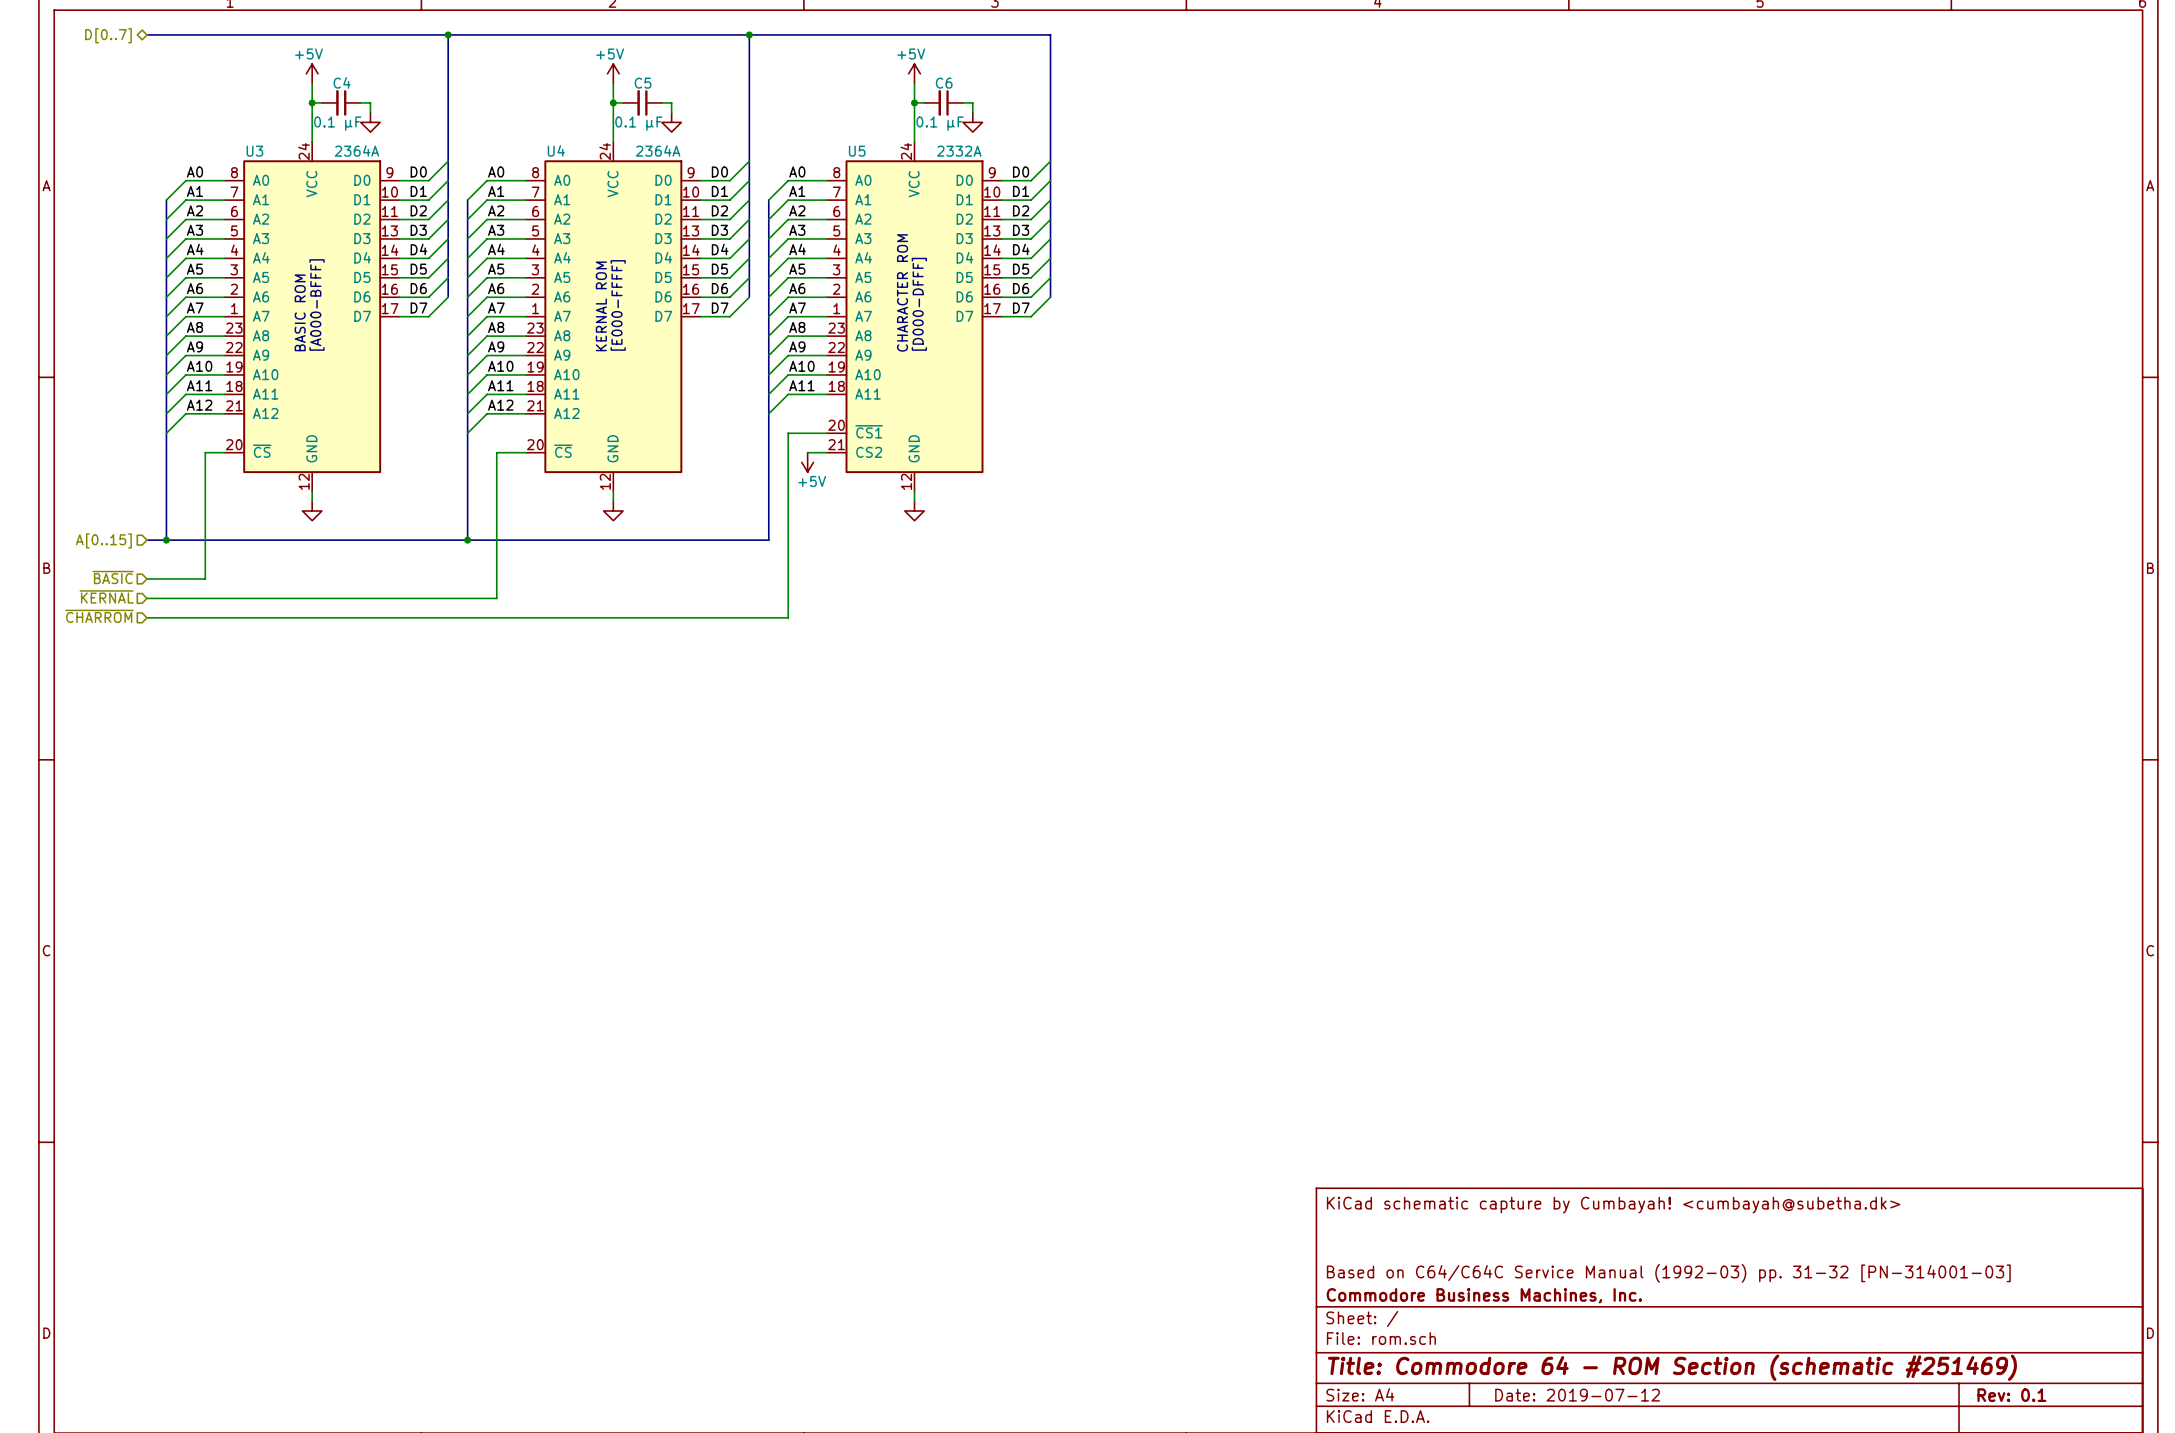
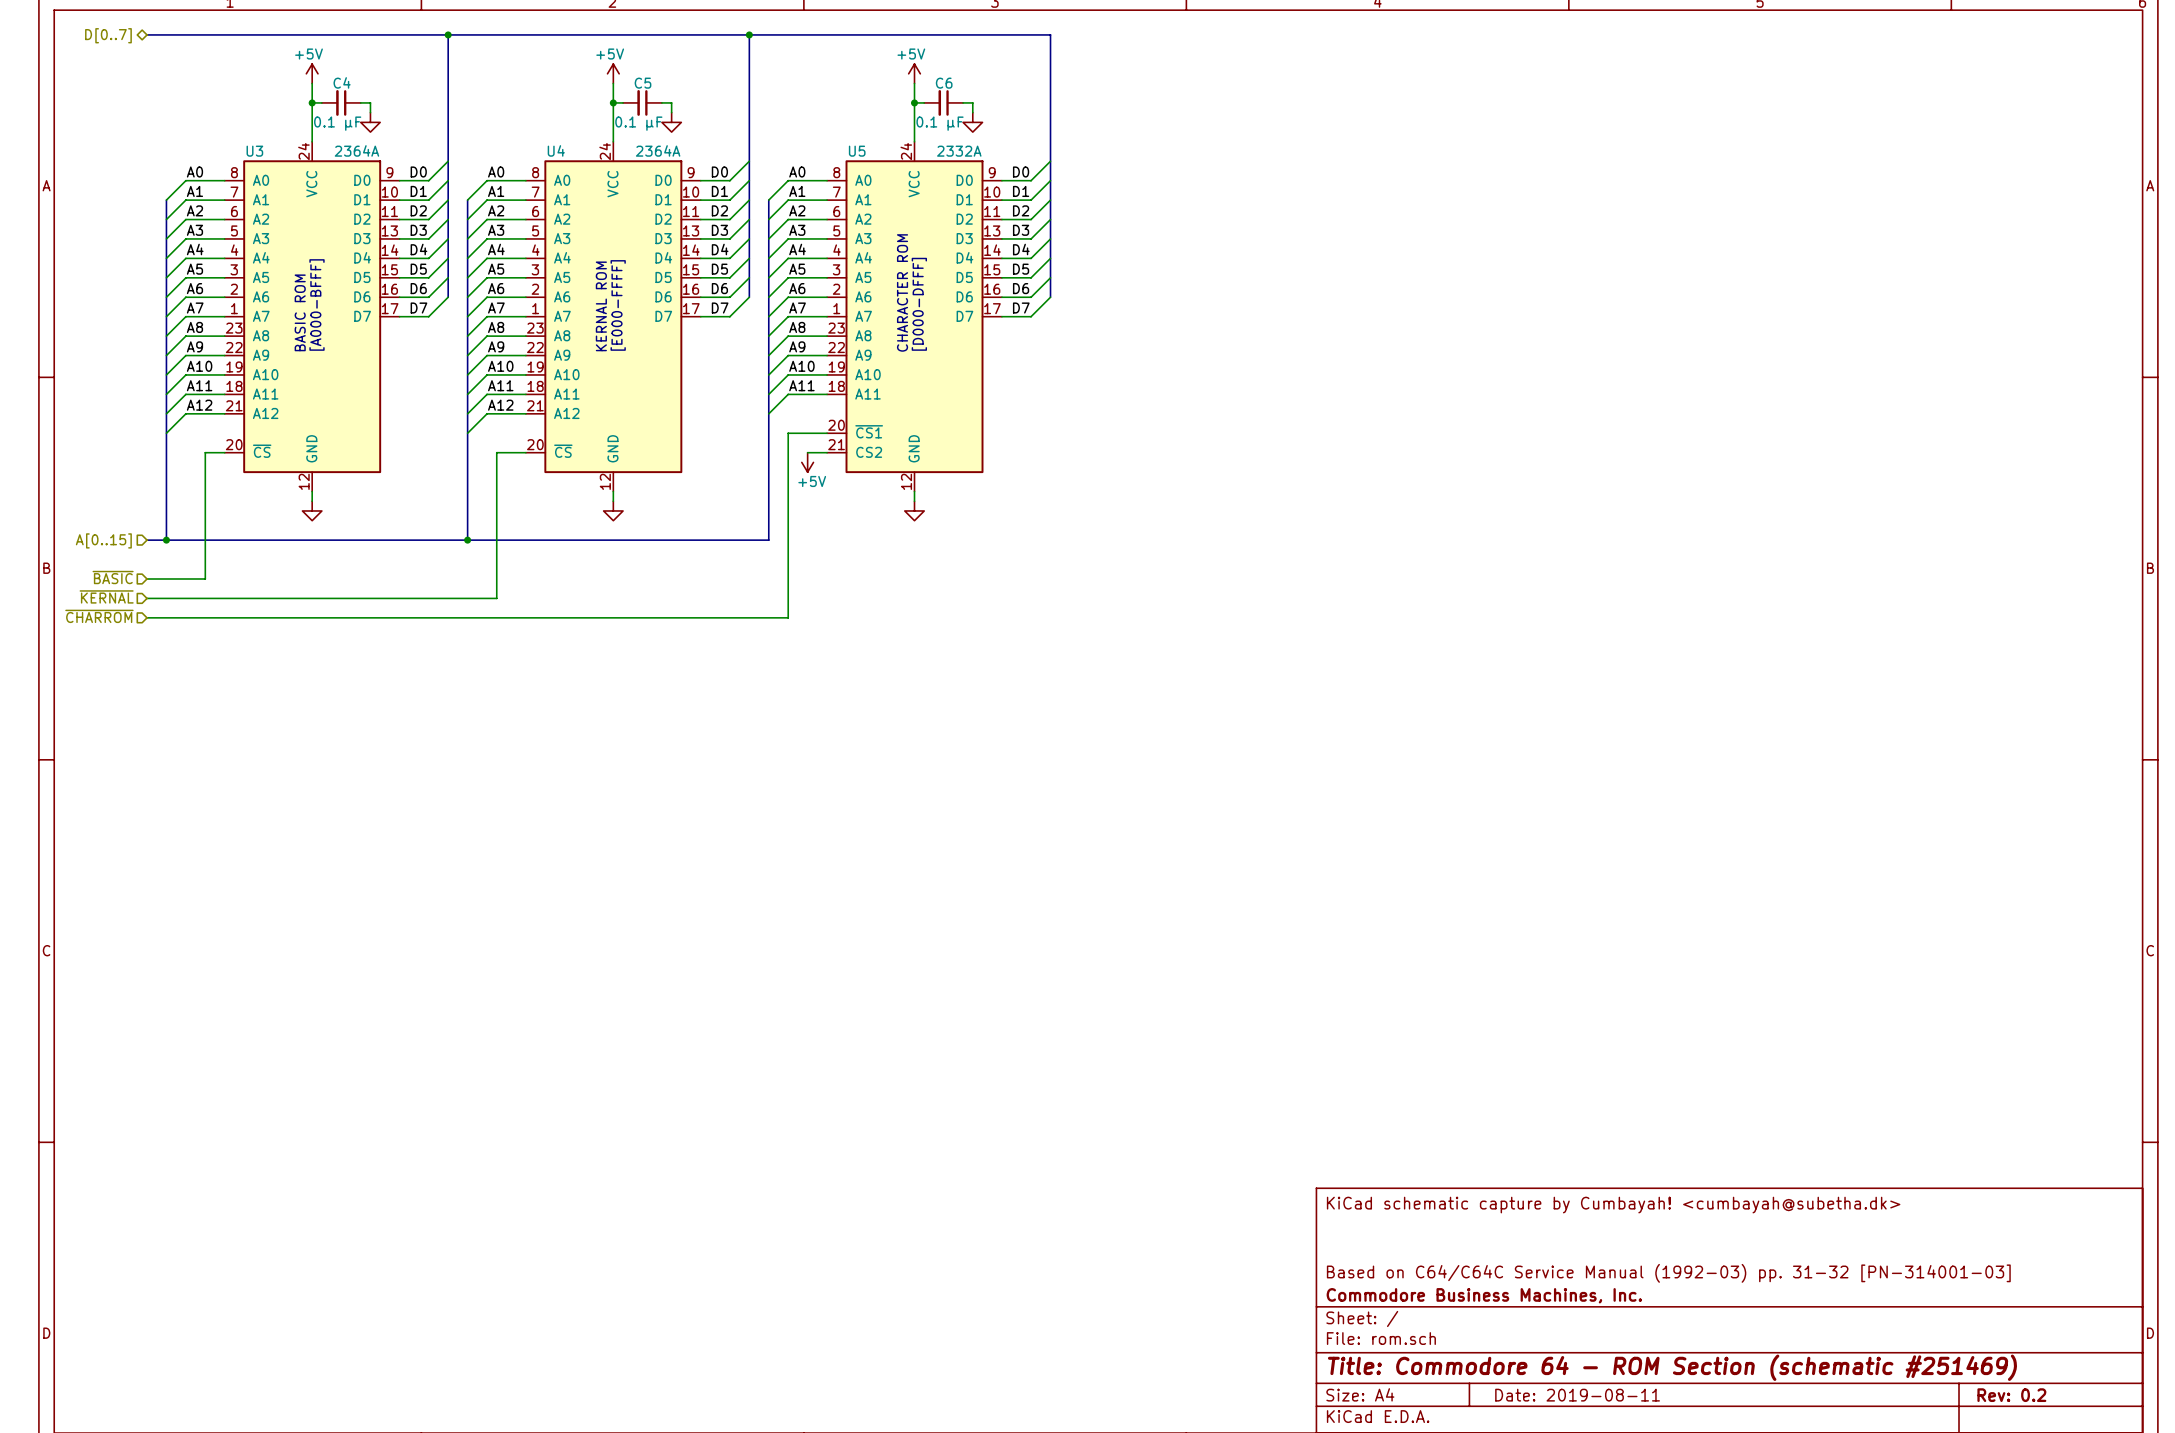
title block: Date: 2019-07-12 (1577, 1395) -> Date: 2019-08-11 (1577, 1395)
title block: Rev: 0.1 (2011, 1395) -> Rev: 0.2 (2011, 1395)

